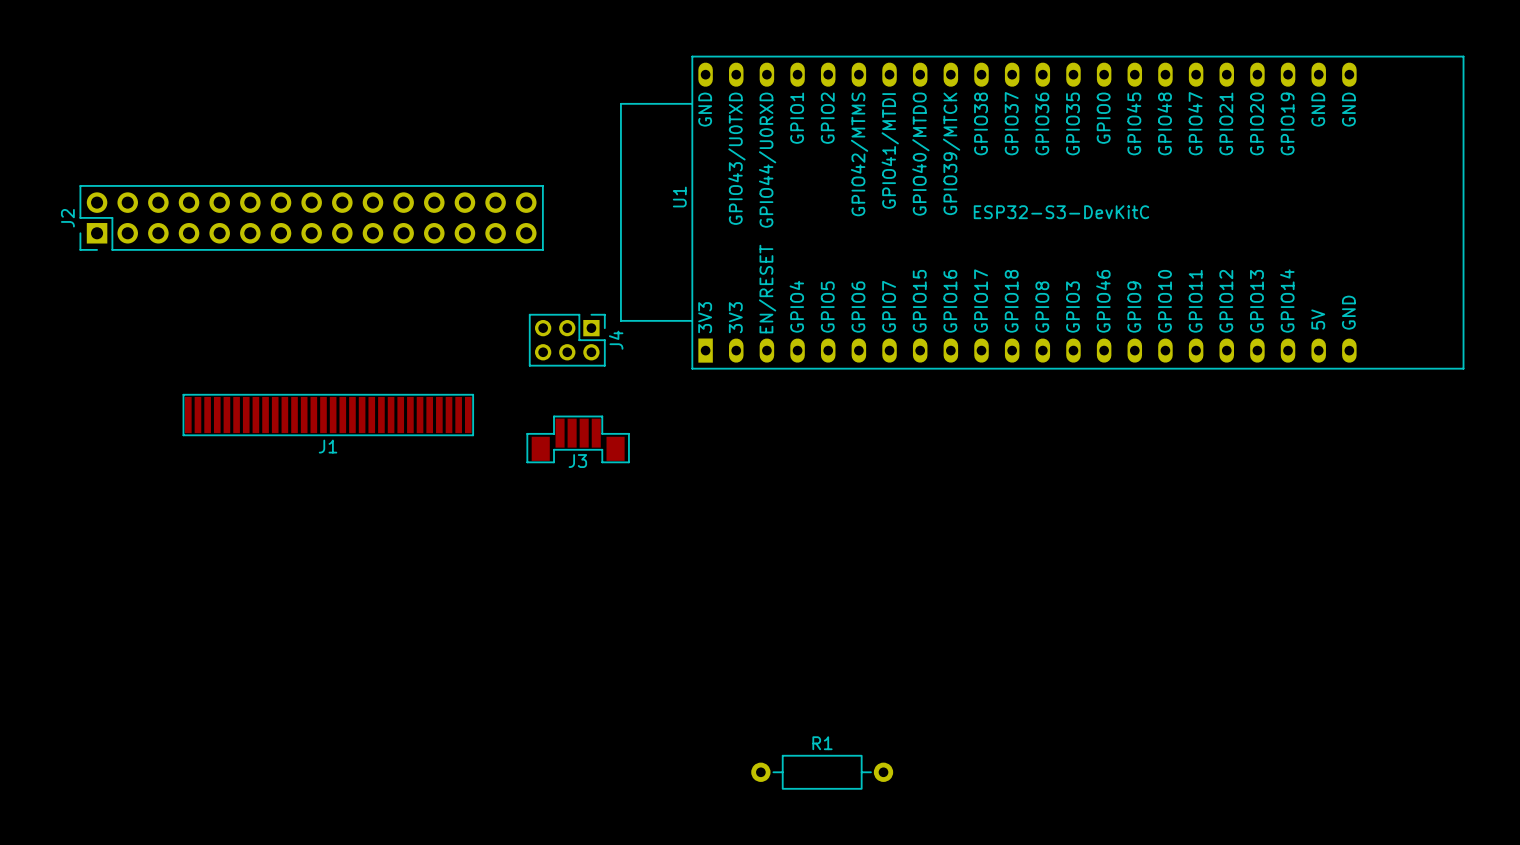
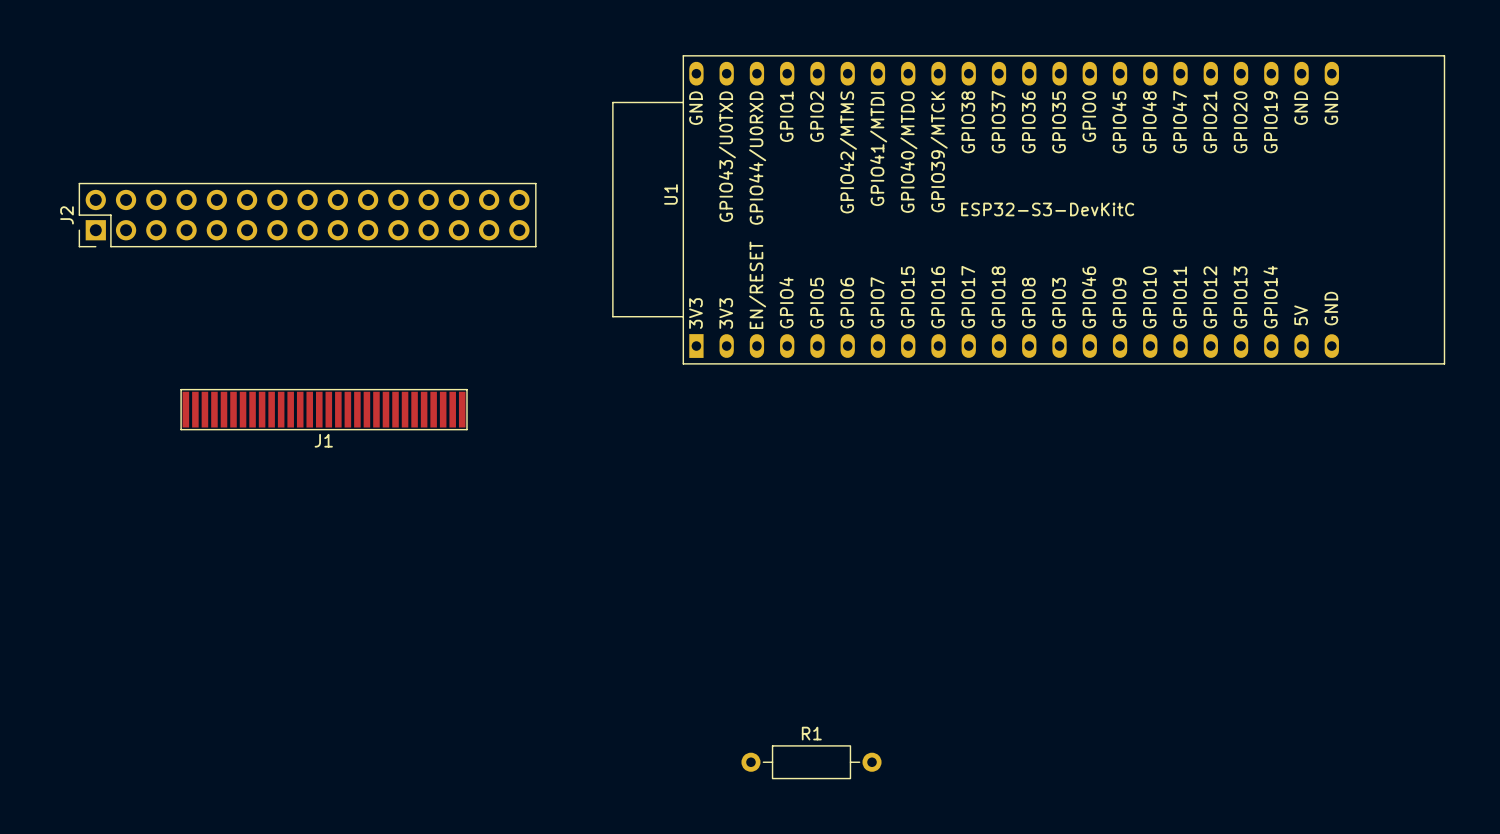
J4: (567, 340) -> none
J3: (578, 439) -> none

